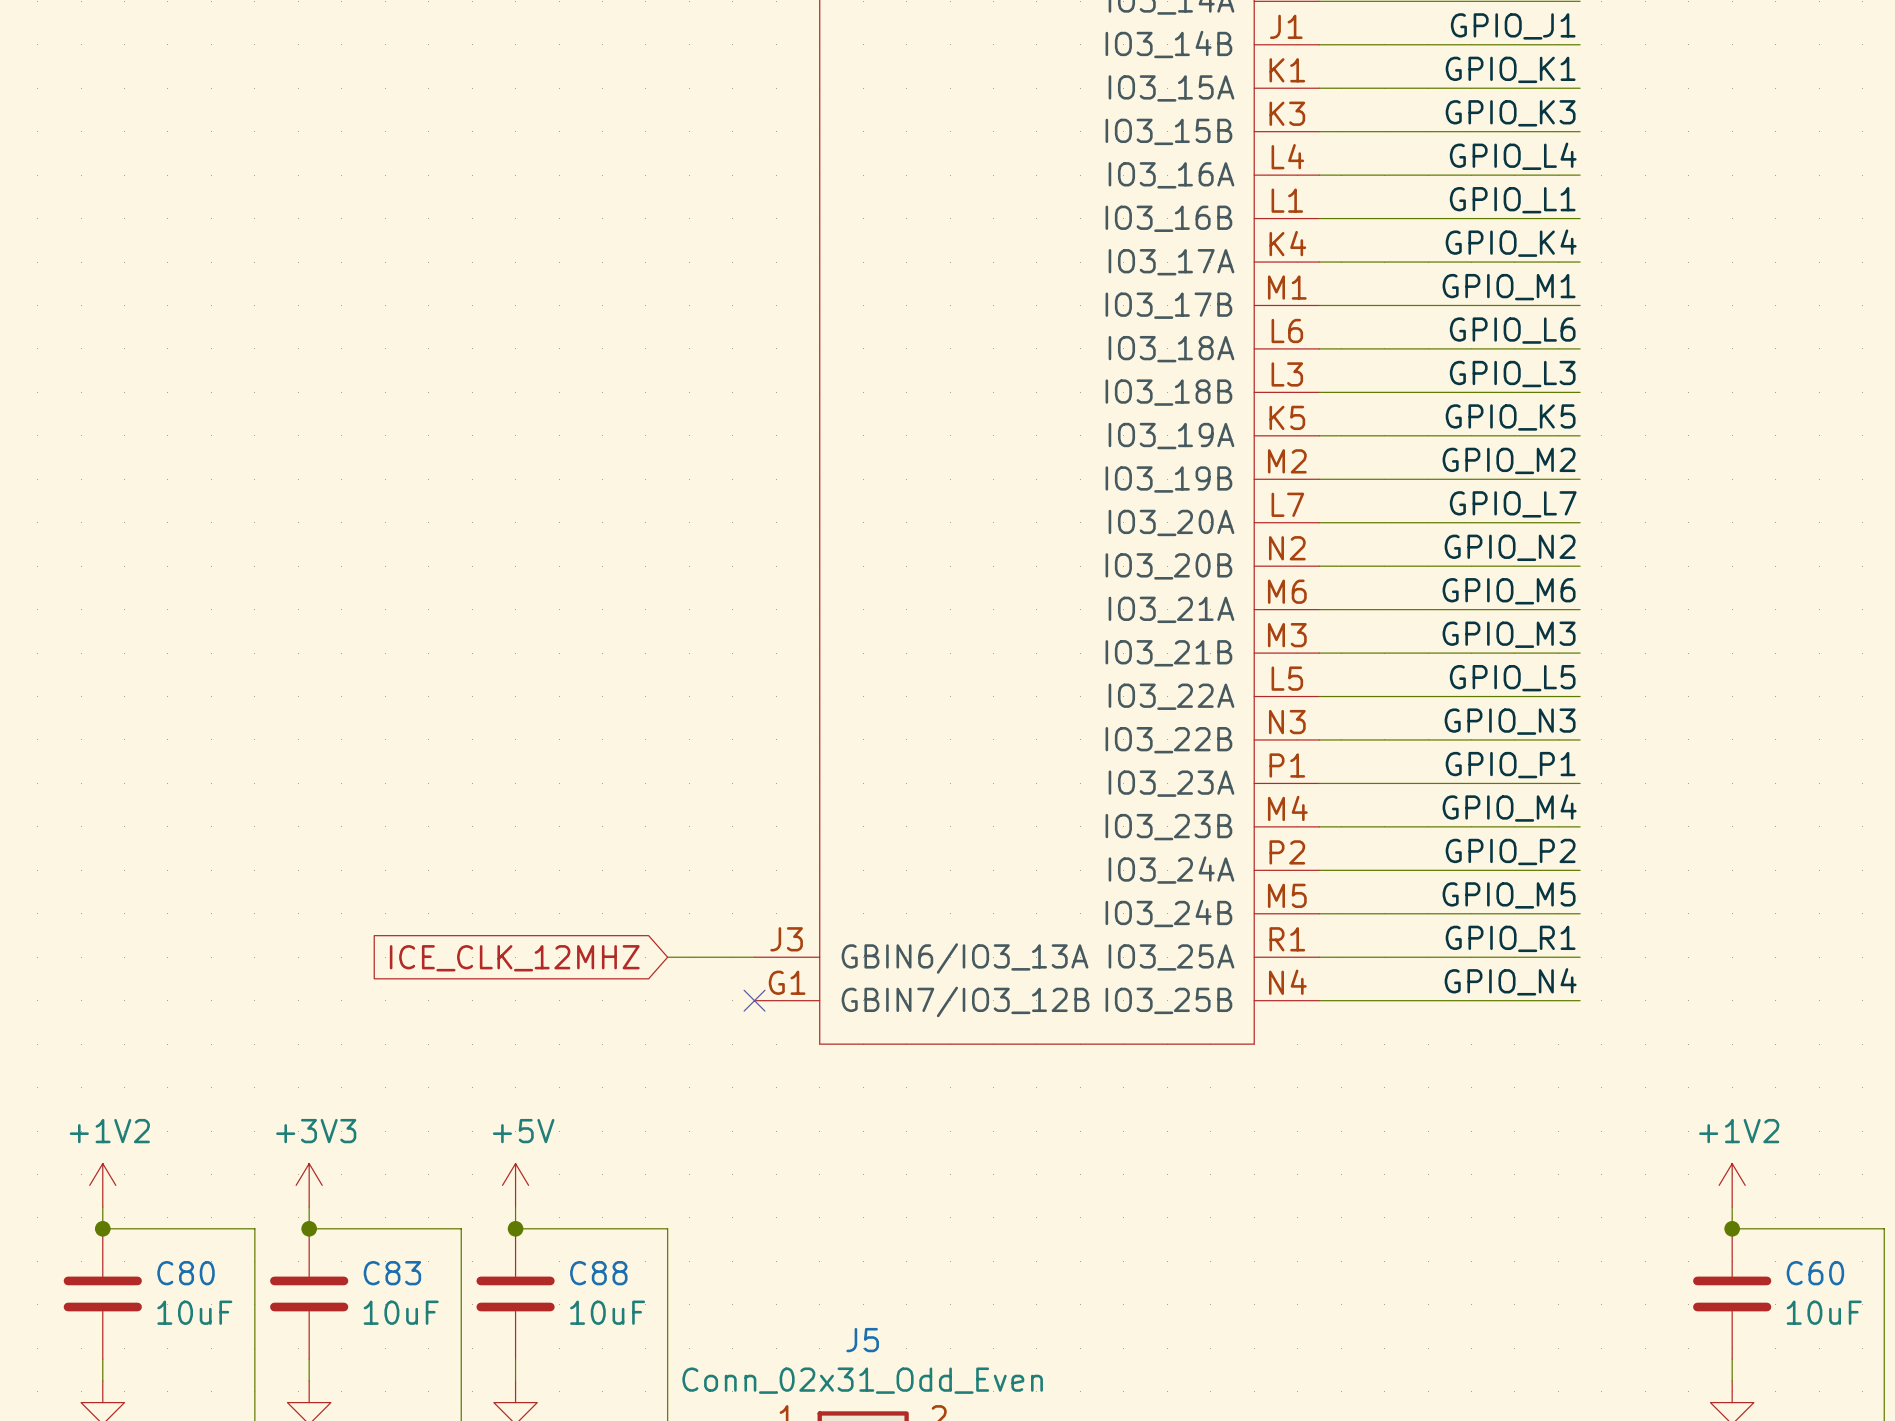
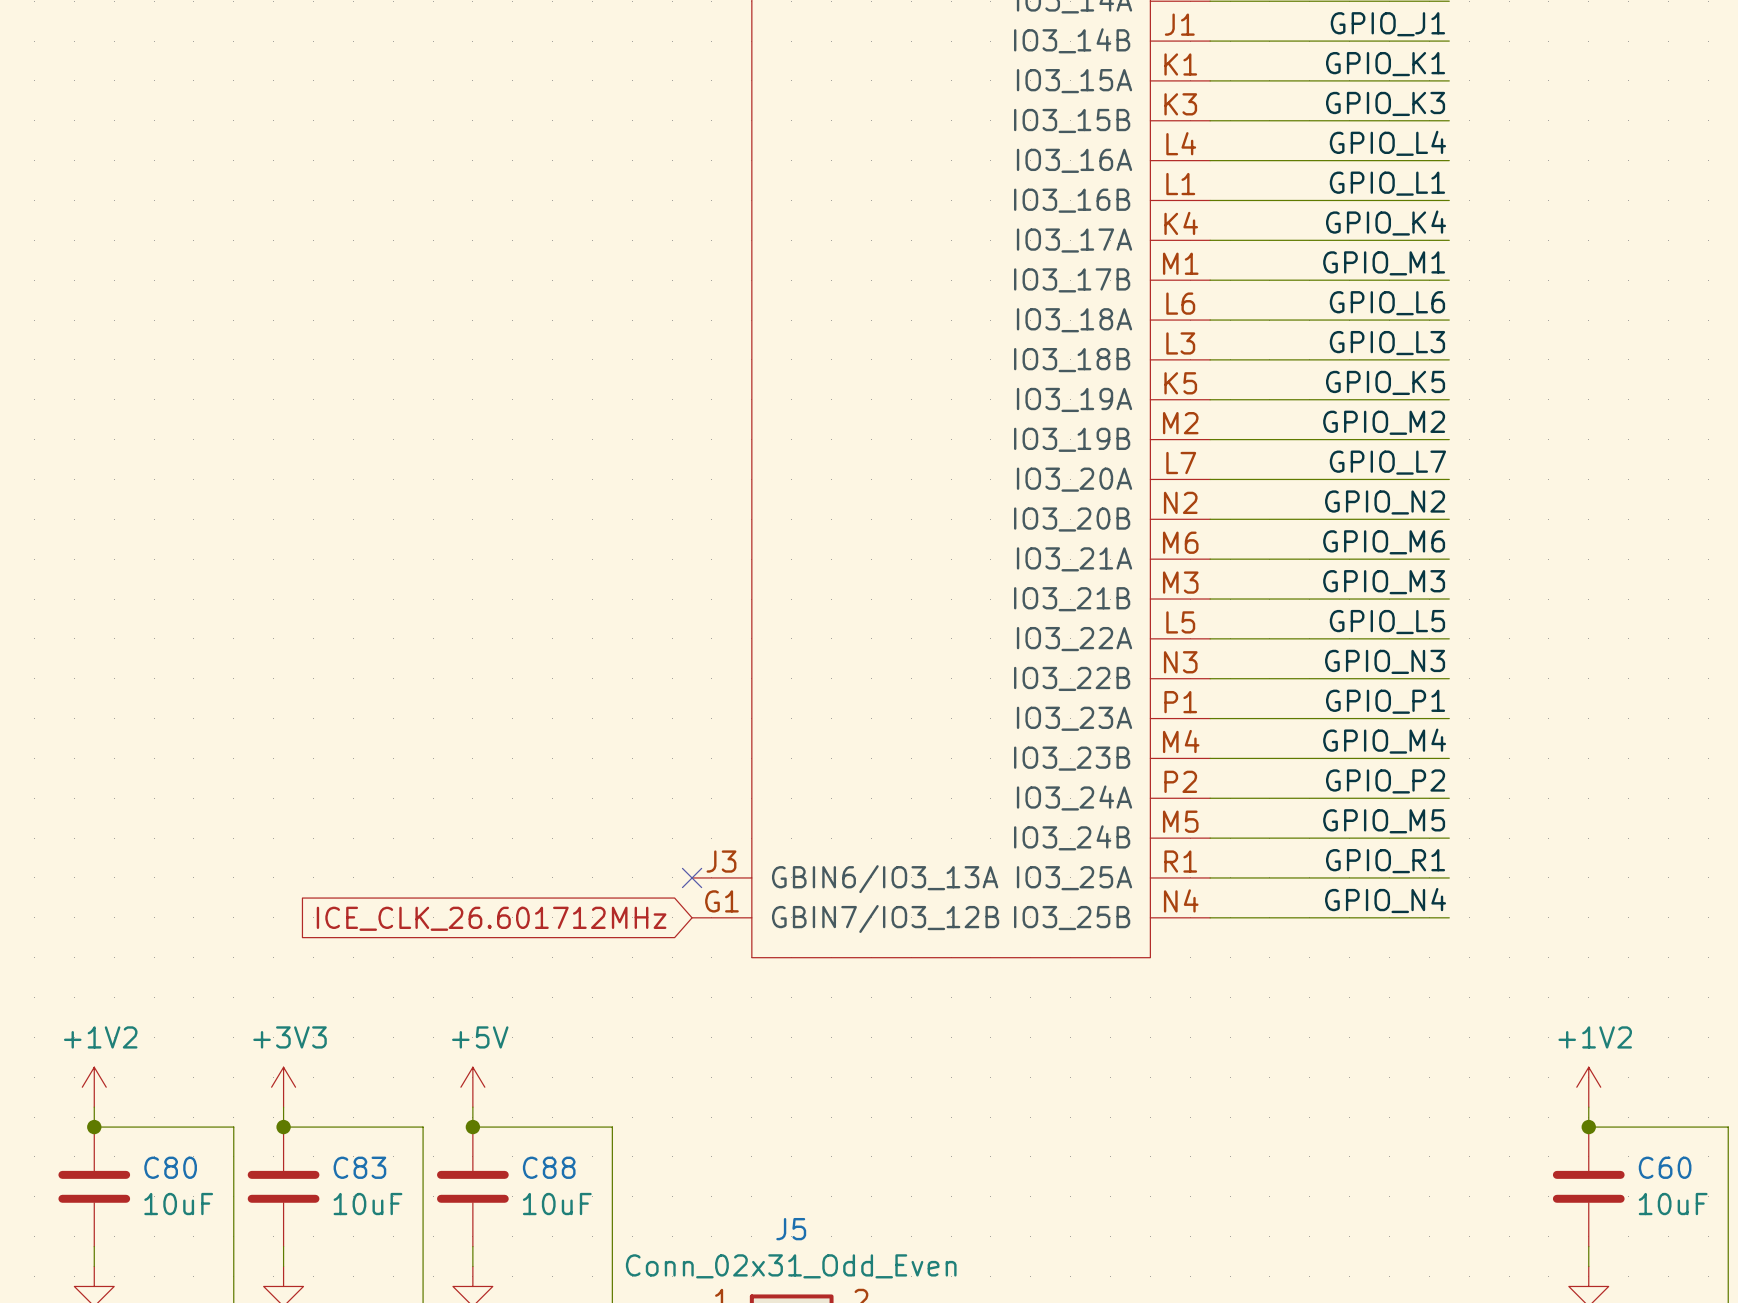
wire: (667, 957) (754, 957) -> none
global label: ICE_CLK_12MHZ (514, 958) -> ICE_CLK_26.601712MHz (491, 918)
no-connect mark position: (754, 1000) -> (692, 877)

